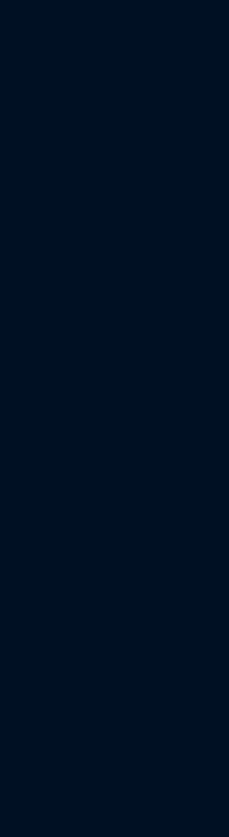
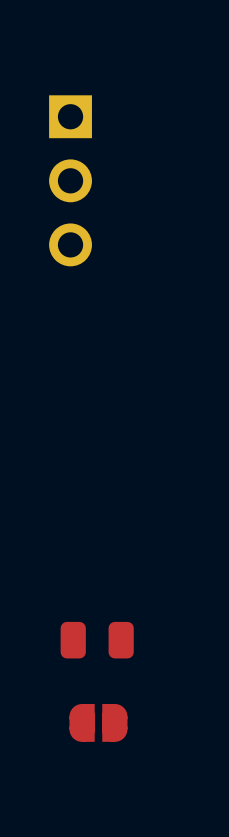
part: none -> (70, 180)
part: none -> (97, 640)
part: none -> (98, 722)

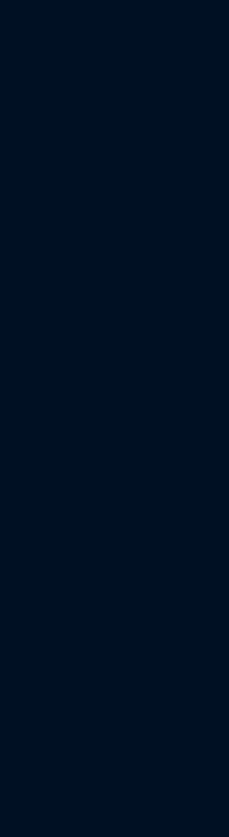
part: (70, 180) -> none
part: (97, 640) -> none
part: (98, 722) -> none

